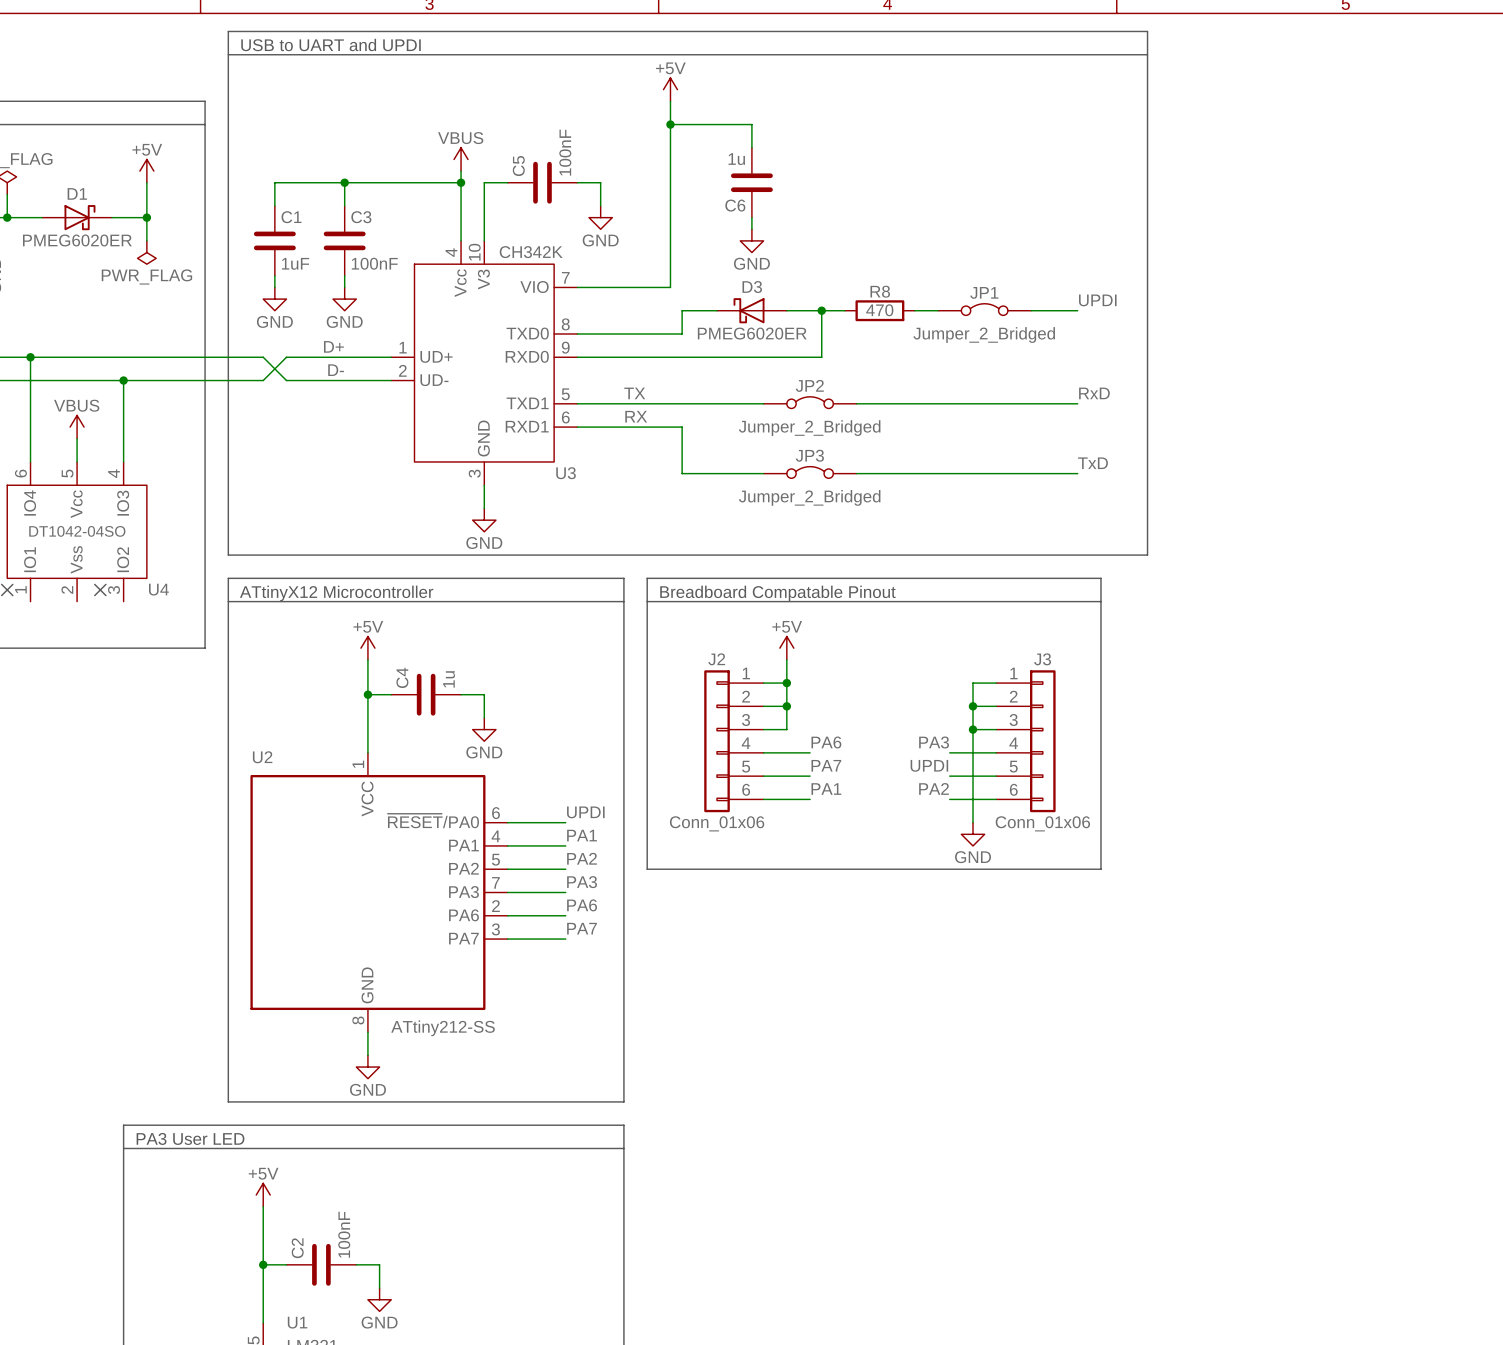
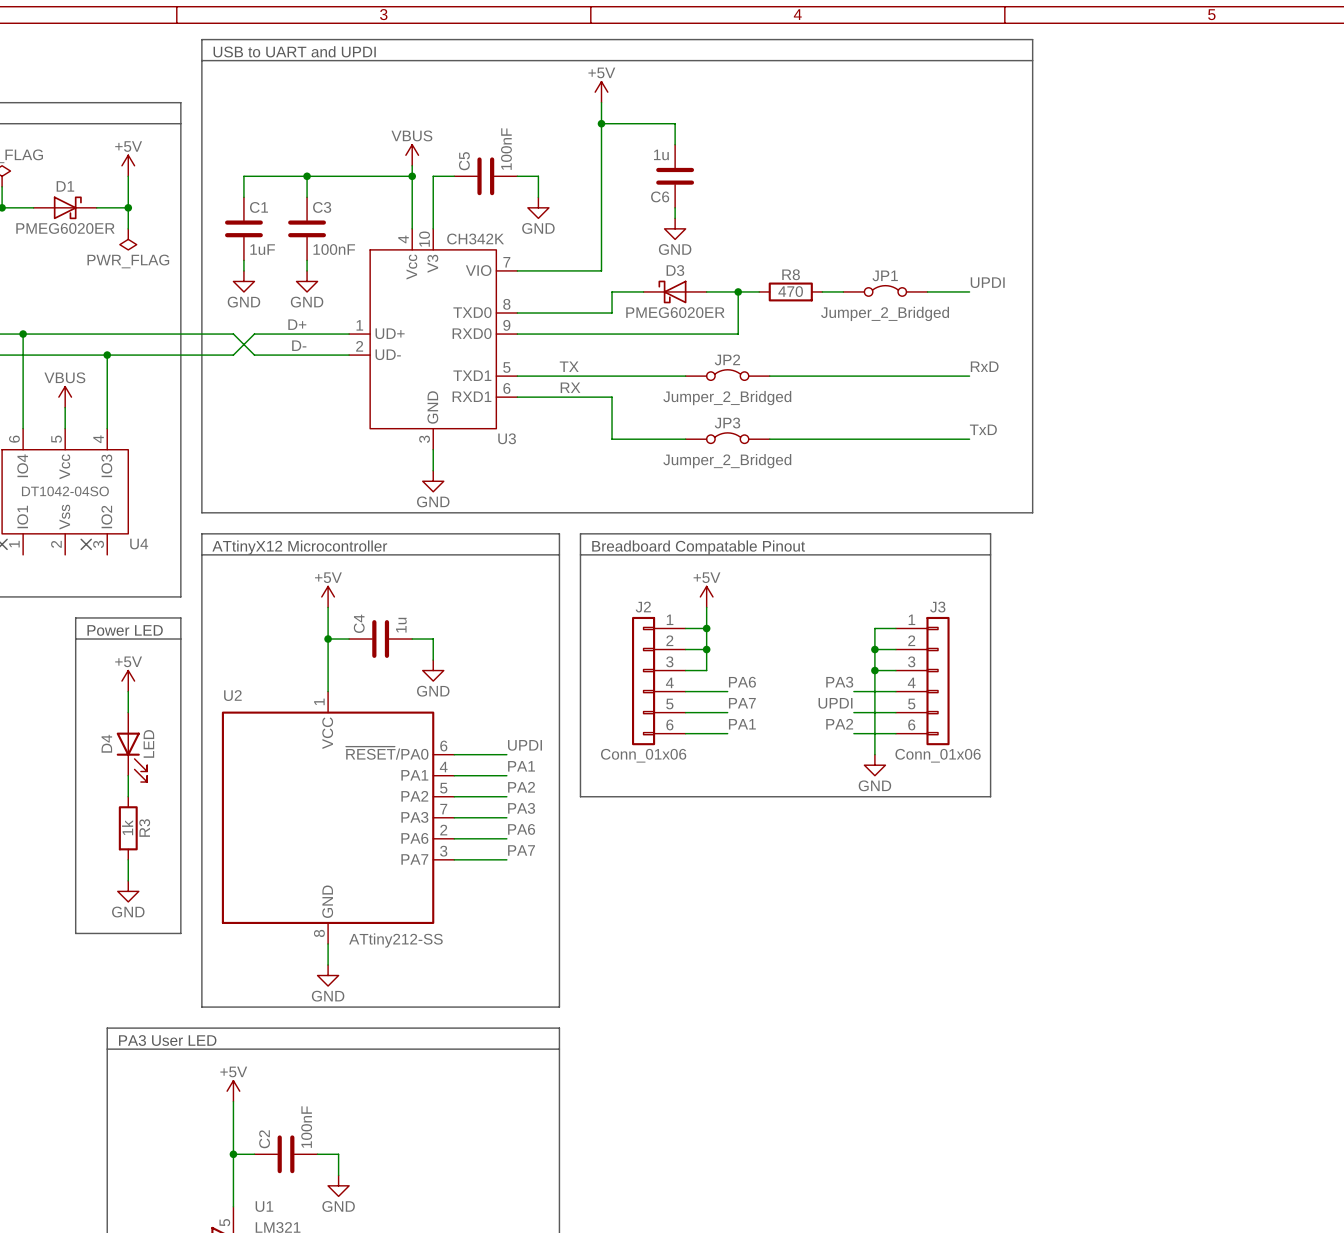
line: none -> (75, 617) (180, 617) (180, 933) (75, 933) (75, 617)
text: none -> Power LED (125, 630)
line: none -> (75, 639) (180, 639)
power symbol: none -> +5V (128, 681)
wire: none -> (128, 691) (128, 712)
D4: none -> LED (131, 747)
wire: none -> (128, 775) (128, 796)
R3: none -> 1k (128, 828)
wire: none -> (128, 859) (128, 880)
power symbol: none -> GND (128, 891)

